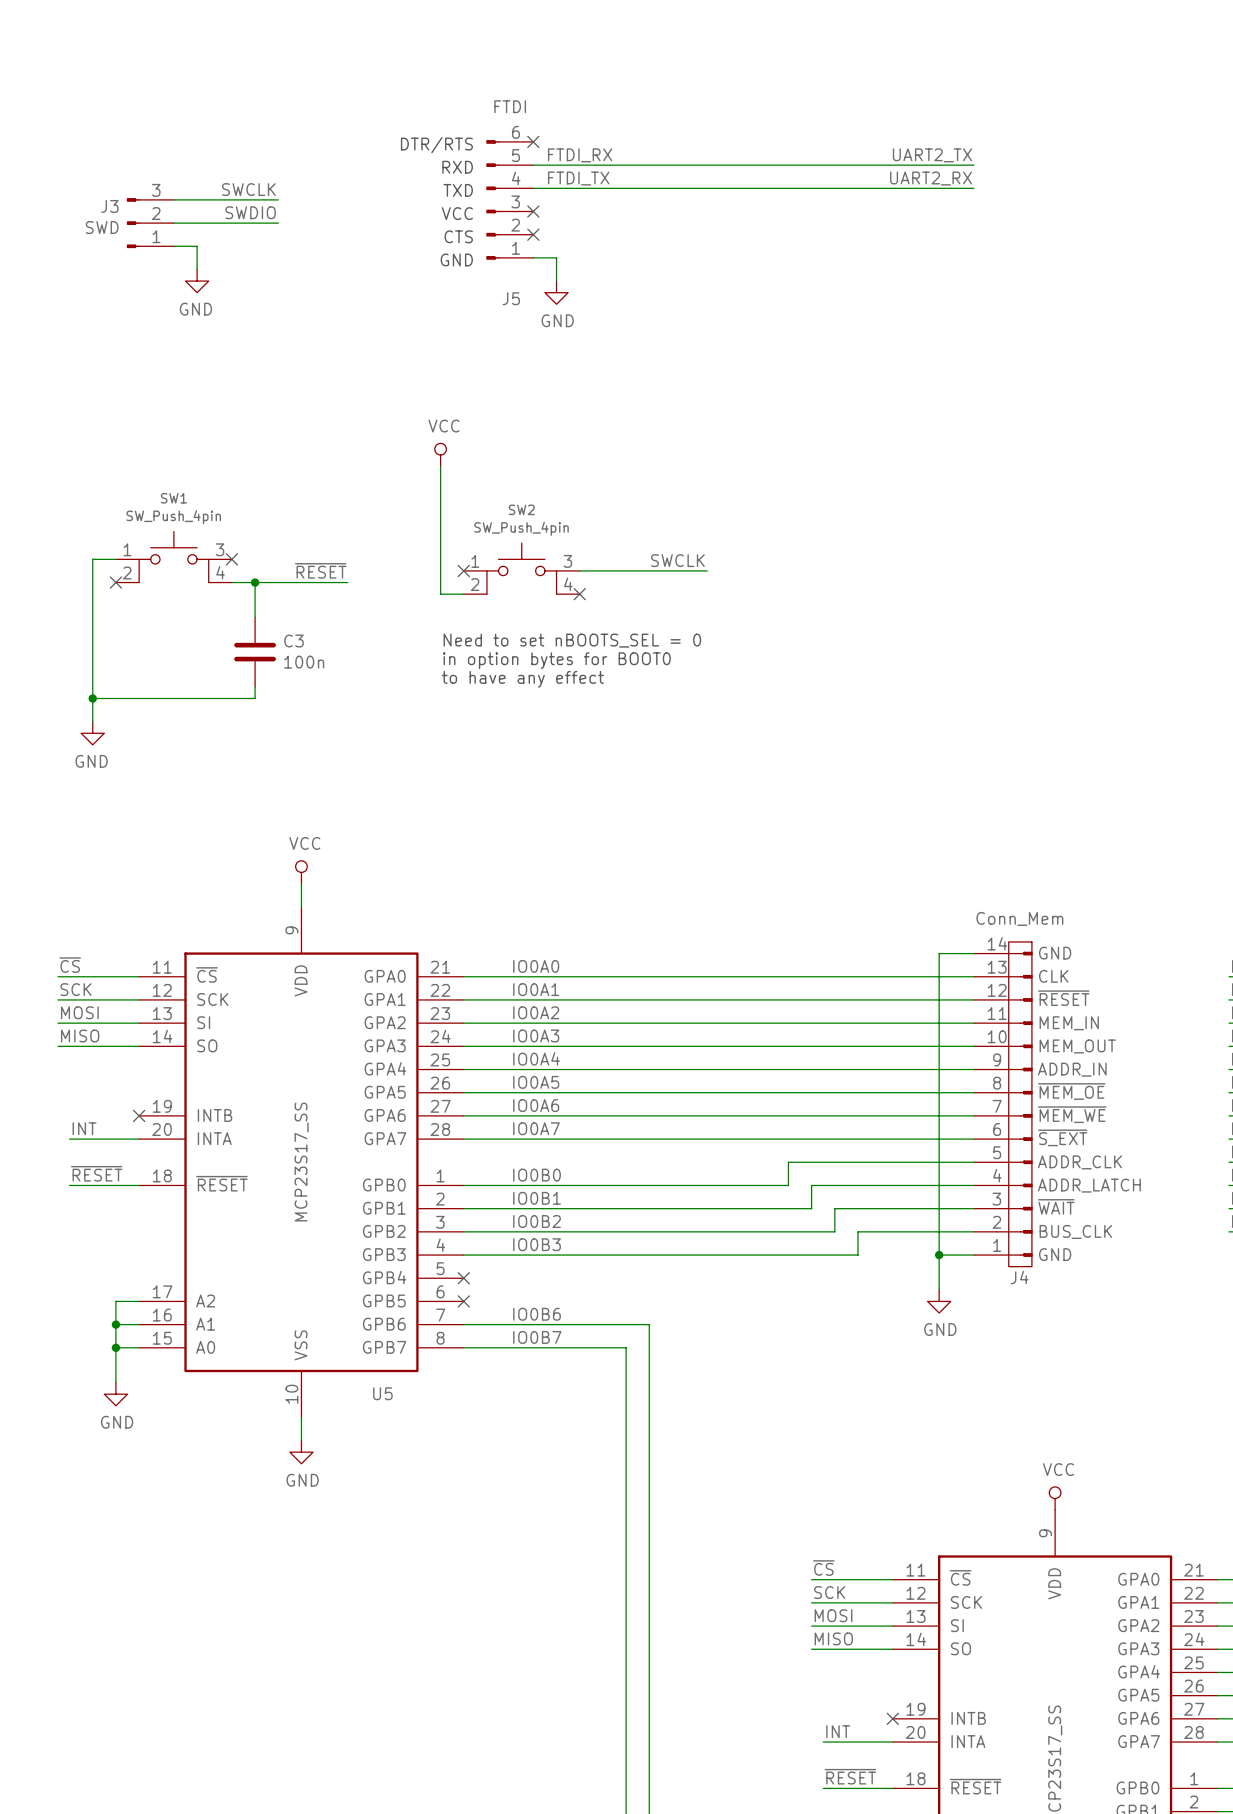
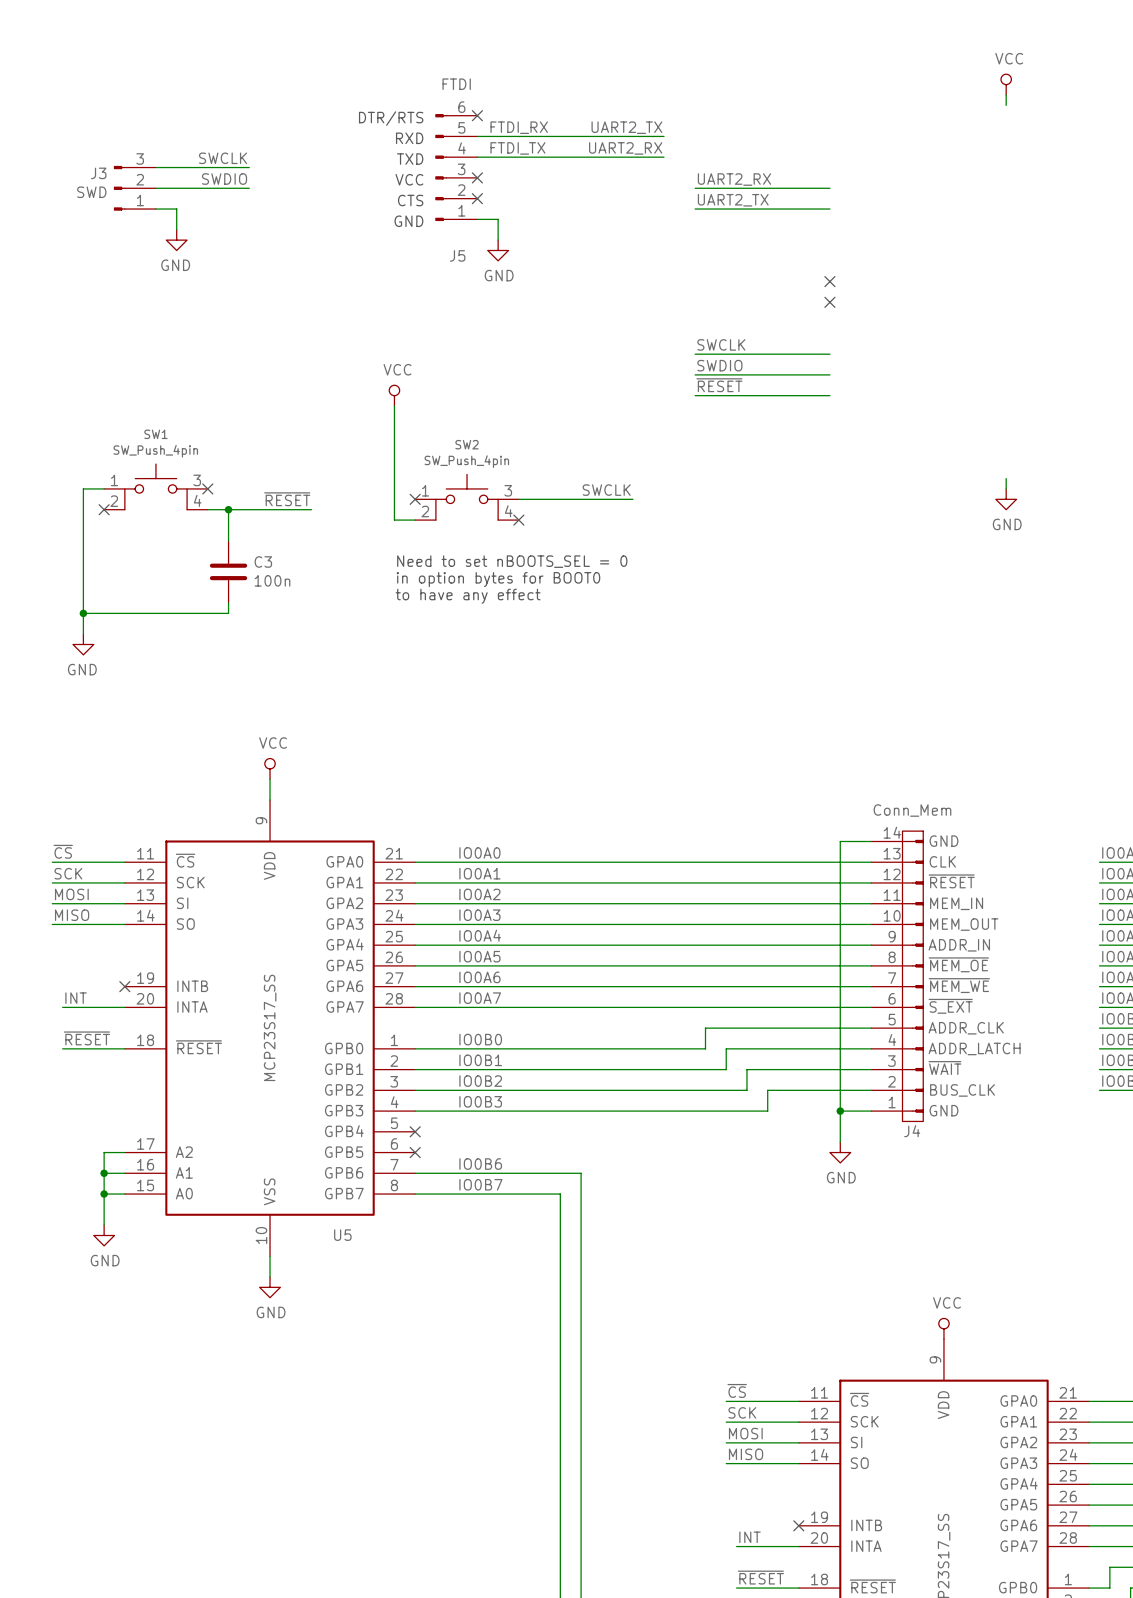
power symbol: none -> VCC (1006, 84)
wire: none -> (1006, 94) (1006, 105)
label: none -> UART2_TX (626, 127)
label: UART2_TX (932, 155) -> none
wire: (742, 165) (973, 165) -> none
label: none -> UART2_RX (625, 148)
label: UART2_RX (931, 178) -> none
wire: (742, 188) (973, 188) -> none
label: none -> UART2_RX (734, 179)
wire: none -> (695, 188) (829, 188)
label: none -> UART2_TX (733, 200)
wire: none -> (695, 209) (829, 209)
no-connect mark: none -> (829, 281)
no-connect mark: none -> (829, 302)
label: none -> SWCLK (721, 344)
wire: none -> (695, 354) (829, 354)
label: none -> SWDIO (719, 365)
wire: none -> (695, 374) (829, 374)
label: none -> ~{RESET} (719, 385)
wire: none -> (695, 395) (829, 395)
wire: none -> (1006, 478) (1006, 488)
power symbol: none -> GND (1006, 499)

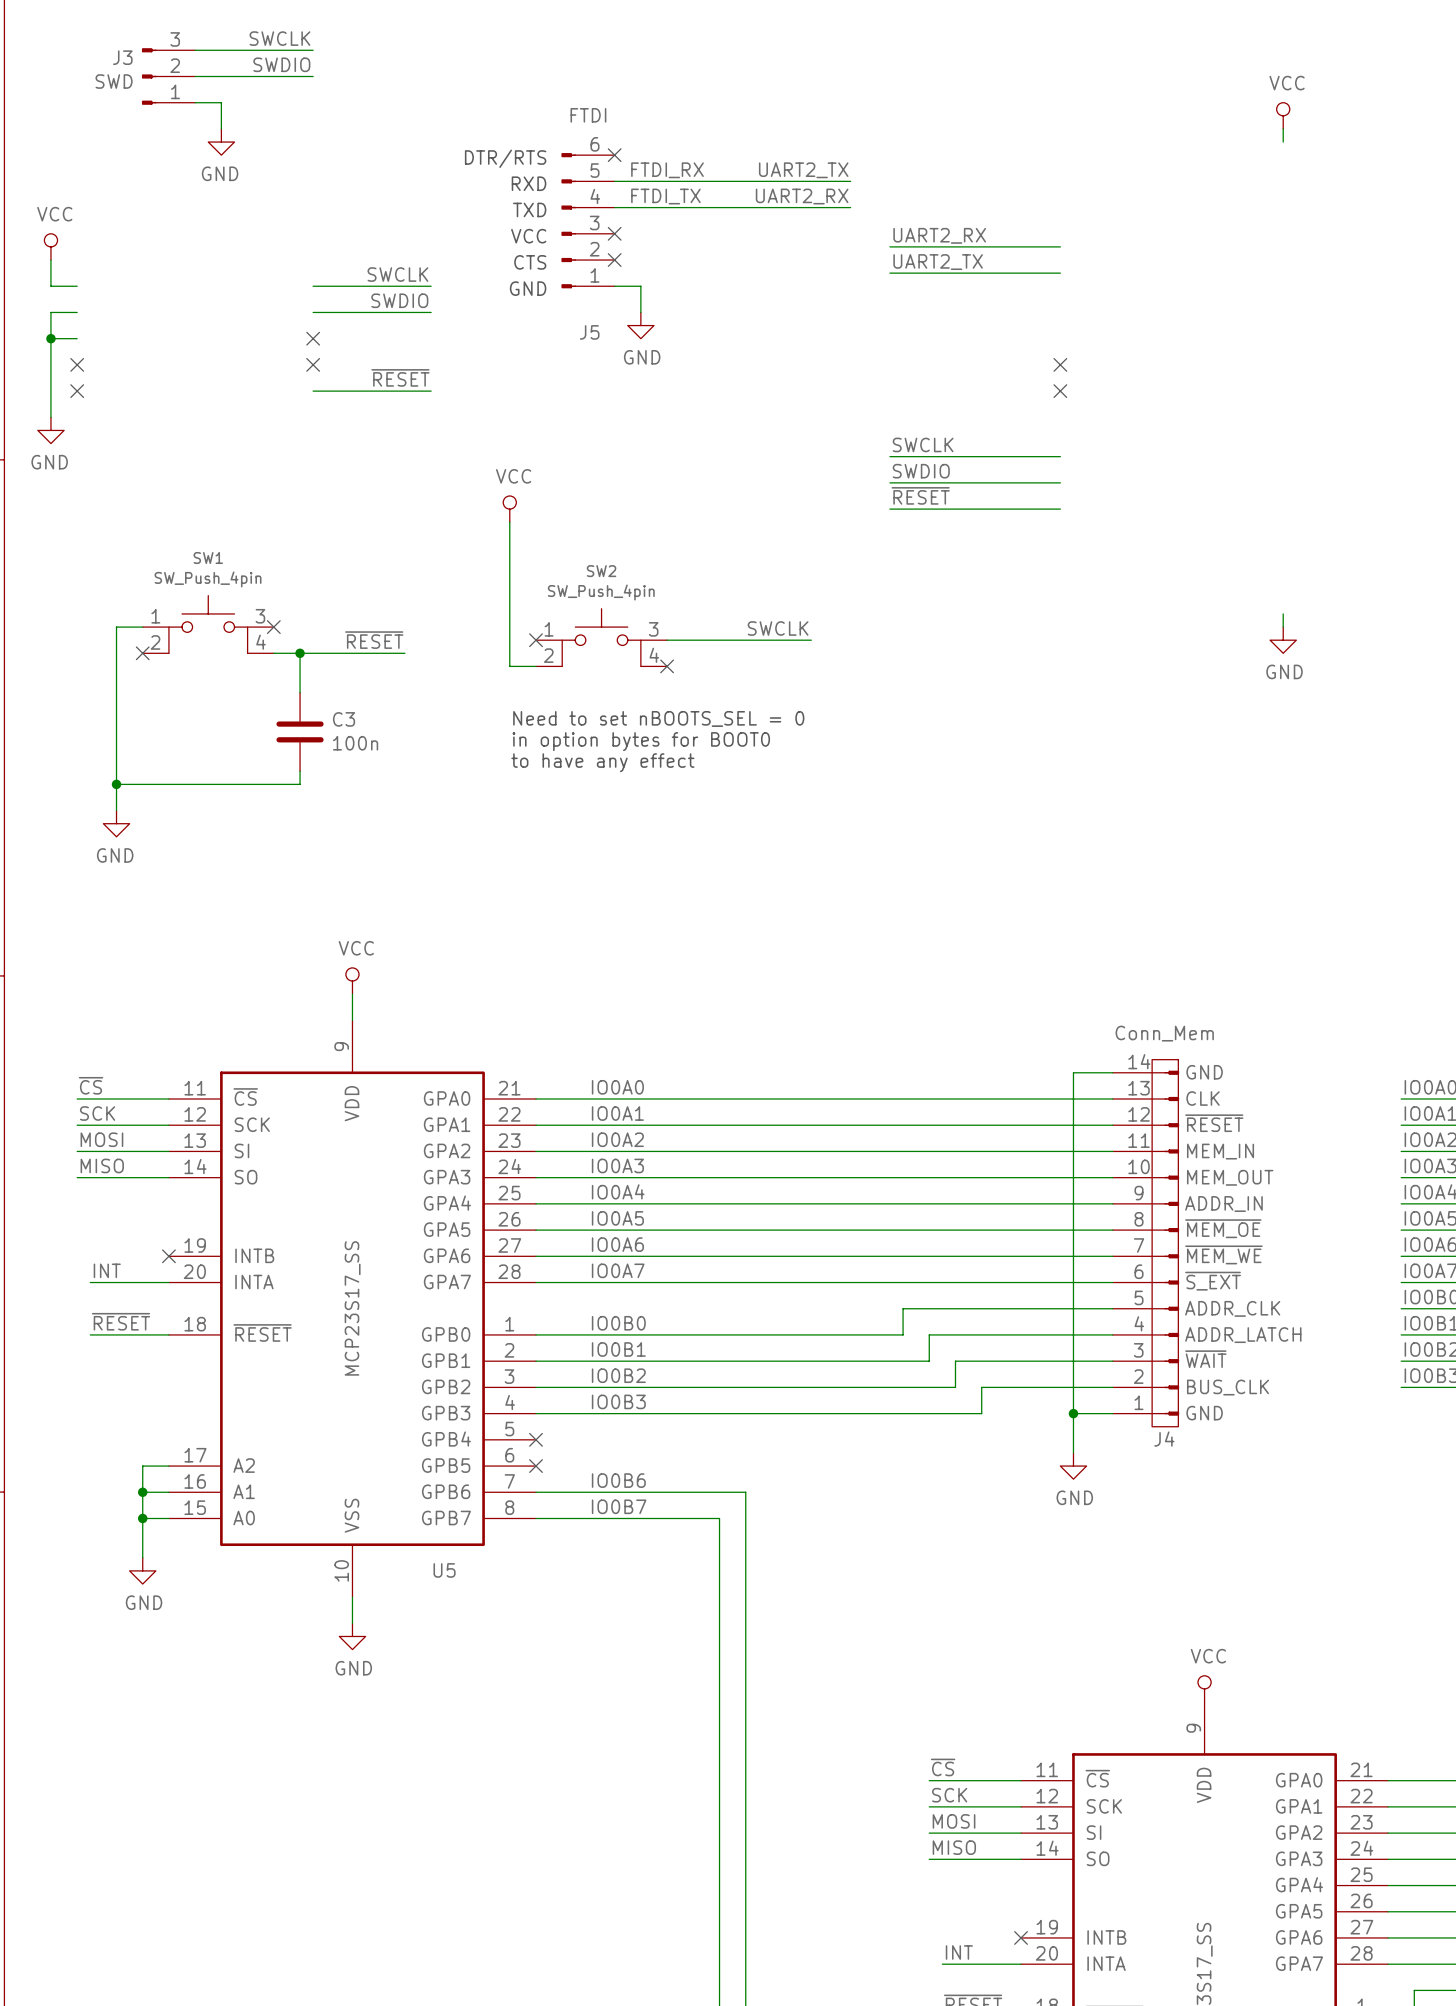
label: none -> SWCLK (279, 38)
label: none -> SWDIO (281, 64)
power symbol: none -> GND (221, 142)
label: SWCLK (223, 158) -> none
wire: (155, 167) (249, 167) -> (195, 50) (313, 50)
label: SWDIO (224, 179) -> none
power symbol: none -> VCC (50, 246)
J3 position: (134, 188) -> (168, 76)
wire: (155, 188) (249, 188) -> (195, 76) (313, 76)
wire: none -> (50, 260) (50, 286) (77, 286)
wire: (155, 209) (176, 209) (176, 229) -> (195, 102) (221, 102) (221, 128)
label: none -> SWCLK (397, 274)
wire: none -> (313, 286) (431, 286)
label: none -> SWDIO (399, 300)
wire: none -> (77, 312) (50, 312) (50, 417)
power symbol: GND (176, 240) -> none
wire: none -> (313, 312) (431, 312)
wire: none -> (50, 338) (77, 338)
junction: none -> (50, 338)
no-connect mark: none -> (313, 338)
no-connect mark: none -> (77, 364)
no-connect mark: none -> (313, 364)
label: none -> ~{RESET} (400, 377)
no-connect mark: none -> (77, 391)
wire: none -> (313, 391) (431, 391)
power symbol: none -> GND (50, 430)

